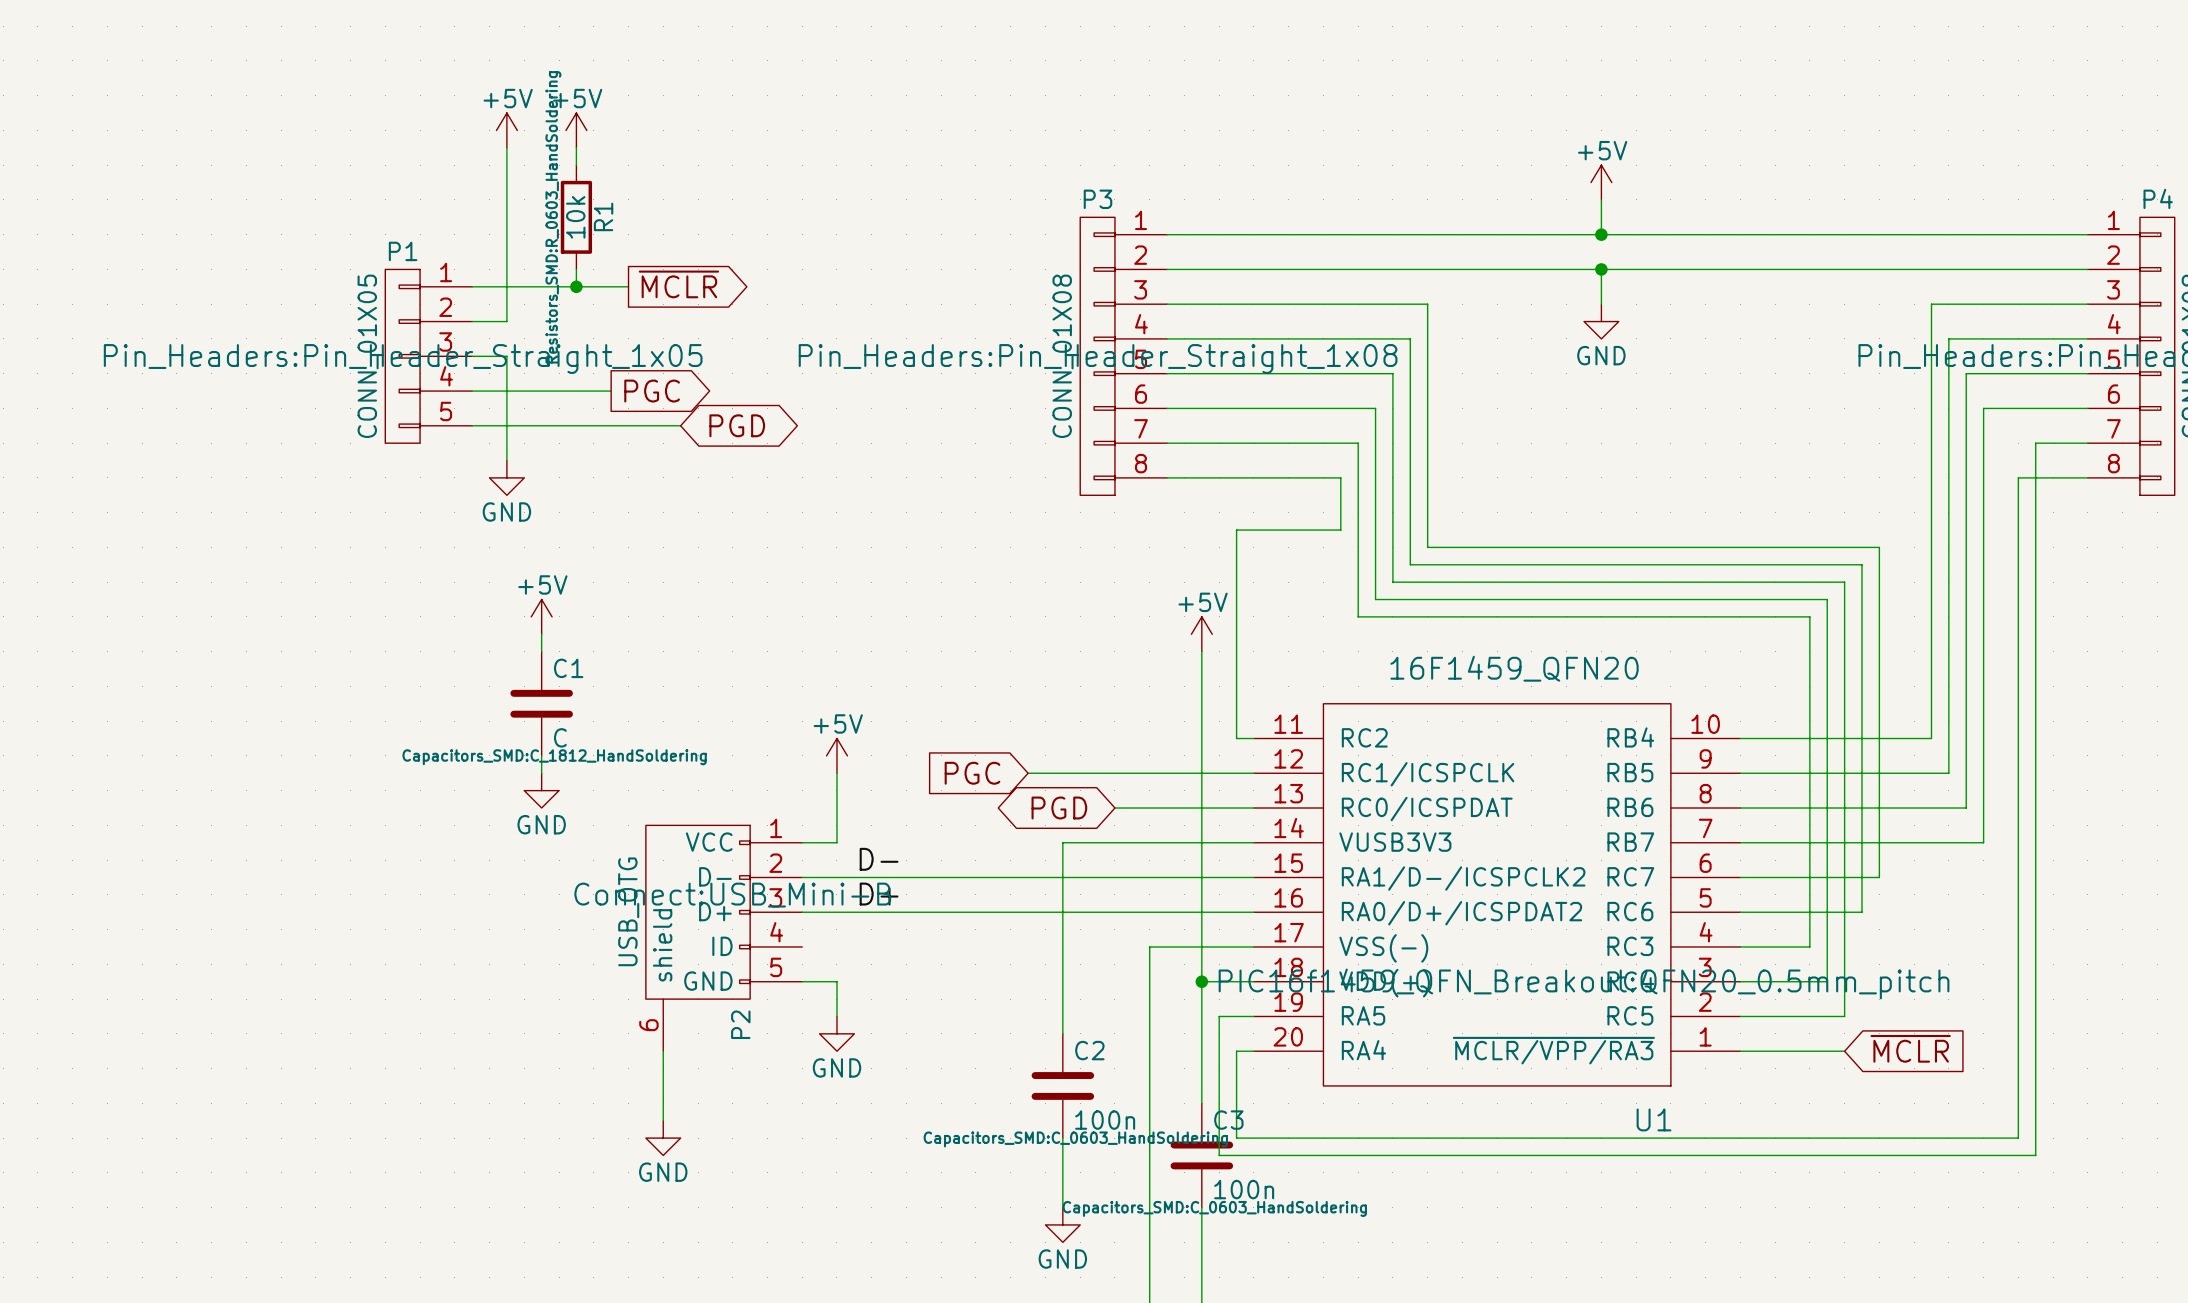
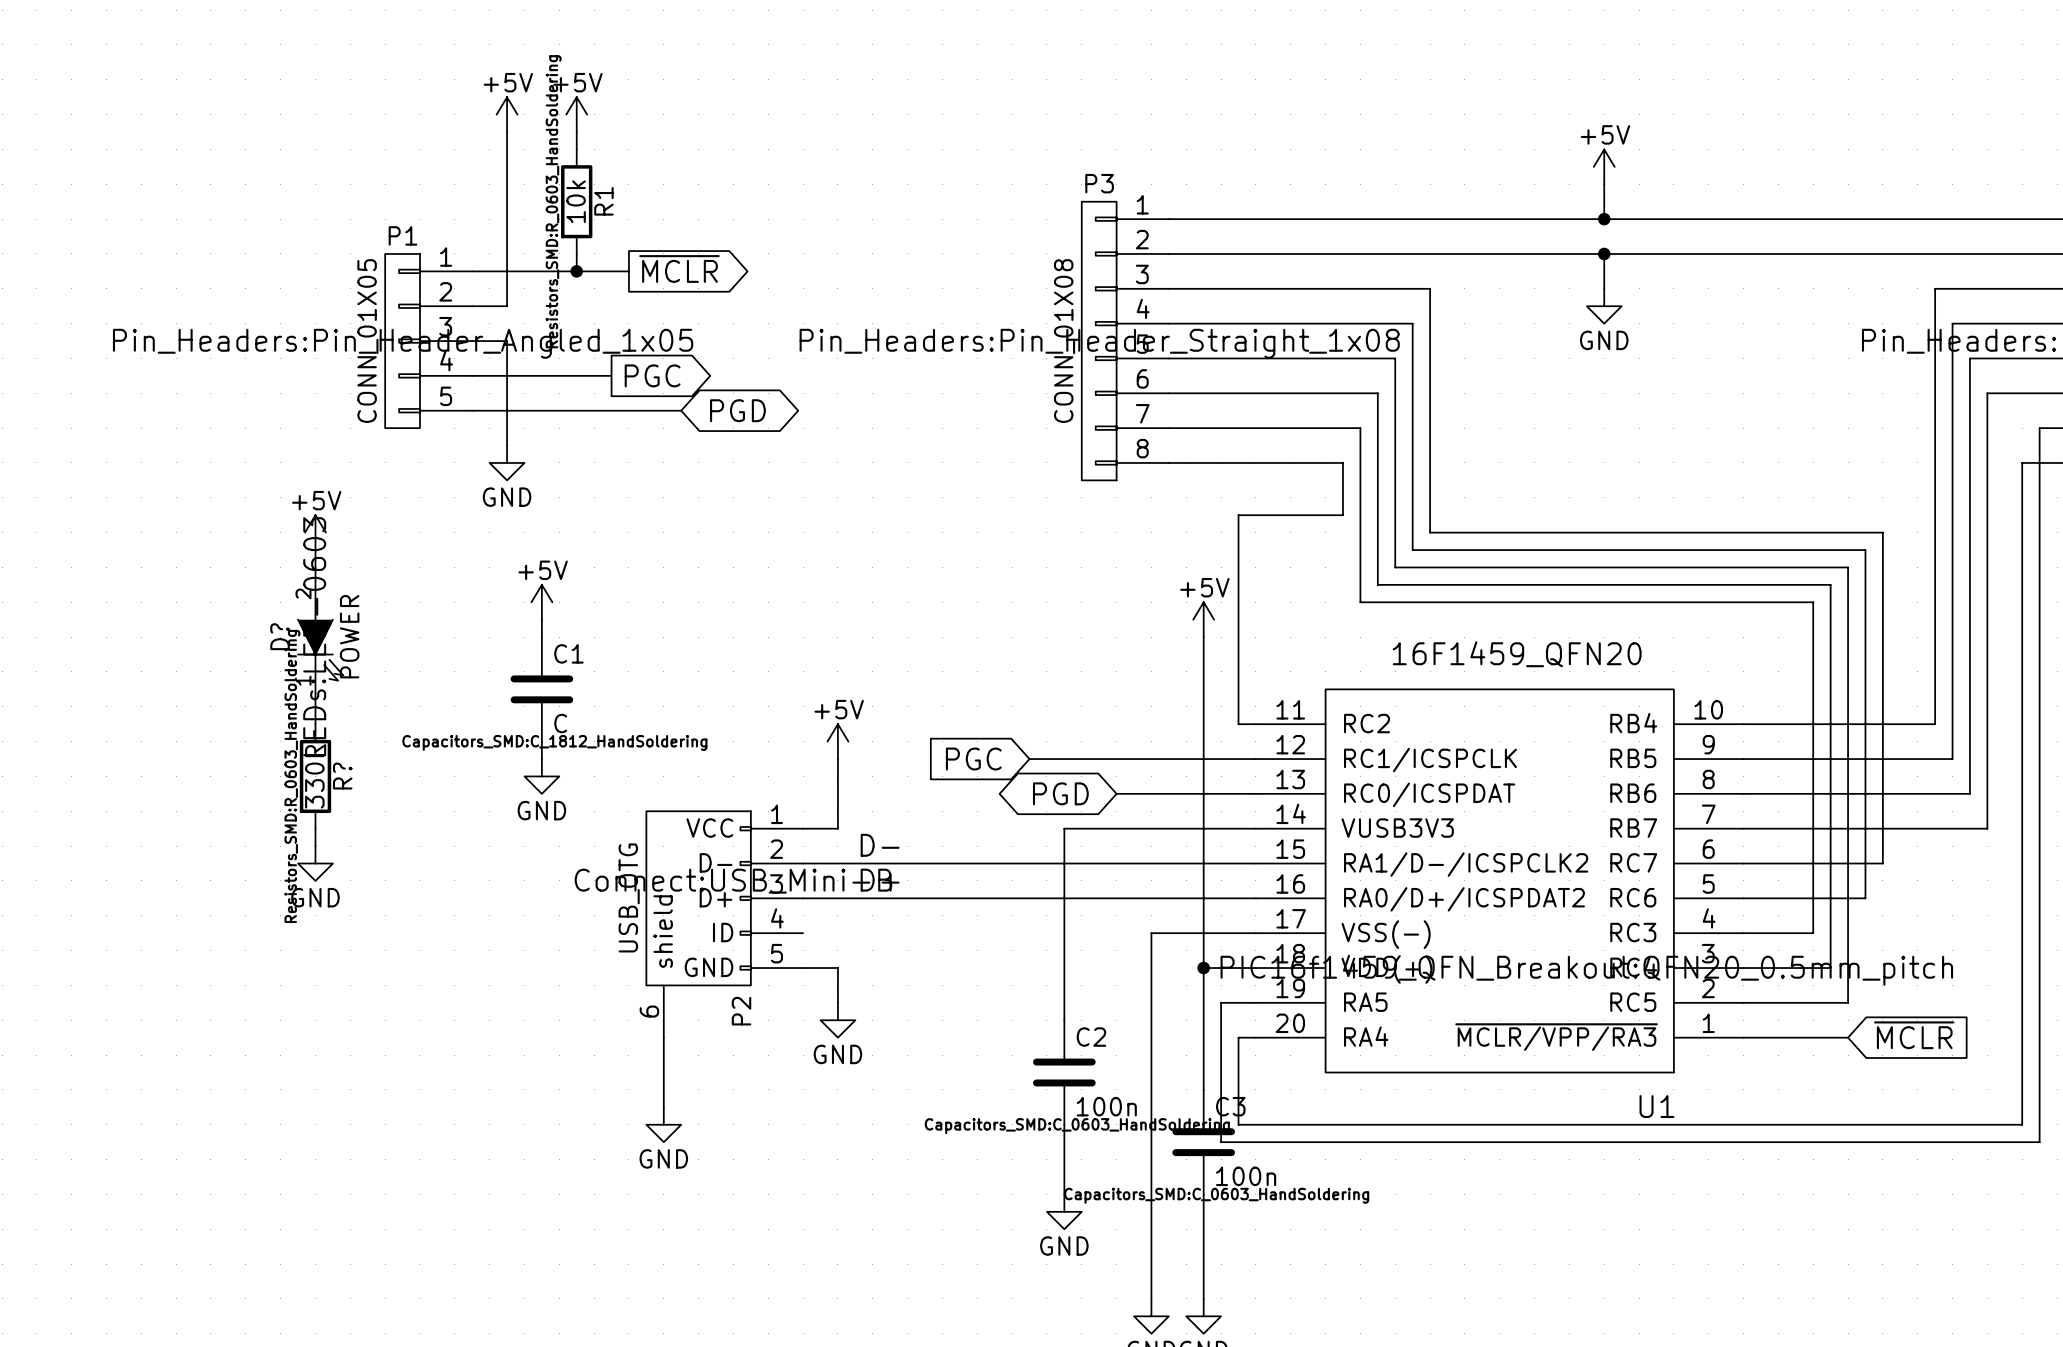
P1 text: Pin_Headers:Pin_Header_Straight_1x05 (403, 359) -> Pin_Headers:Pin_Header_Angled_1x05 (403, 343)
power symbol: none -> +5V (315, 532)
wire: none -> (315, 550) (315, 567)
D?: none -> POWER (320, 637)
wire: none -> (315, 706) (315, 724)
R?: none -> 330R (315, 776)
wire: none -> (315, 828) (315, 846)
power symbol: none -> GND (315, 863)

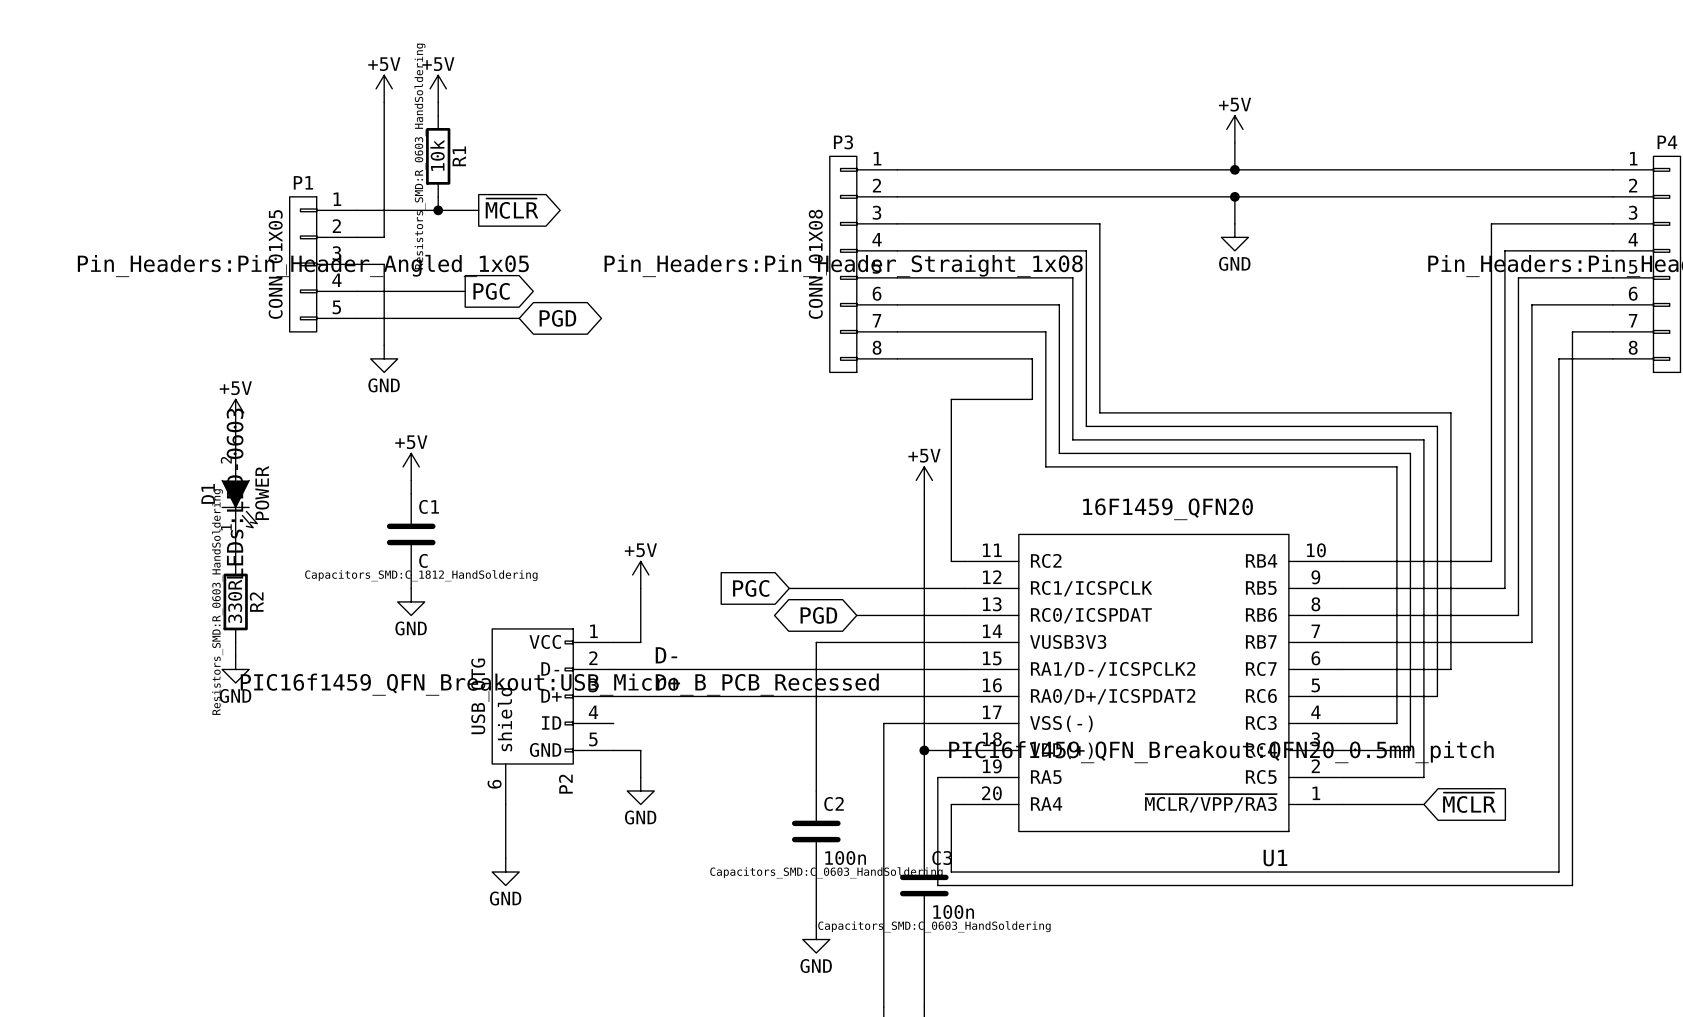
D? name: D? (280, 636) -> D1 (208, 493)
R? name: R? (342, 776) -> R2 (256, 602)
P2 text: Connect:USB_Mini-B (733, 881) -> PIC16f1459_QFN_Breakout:USB_Micro_B_PCB_Recessed (559, 684)

